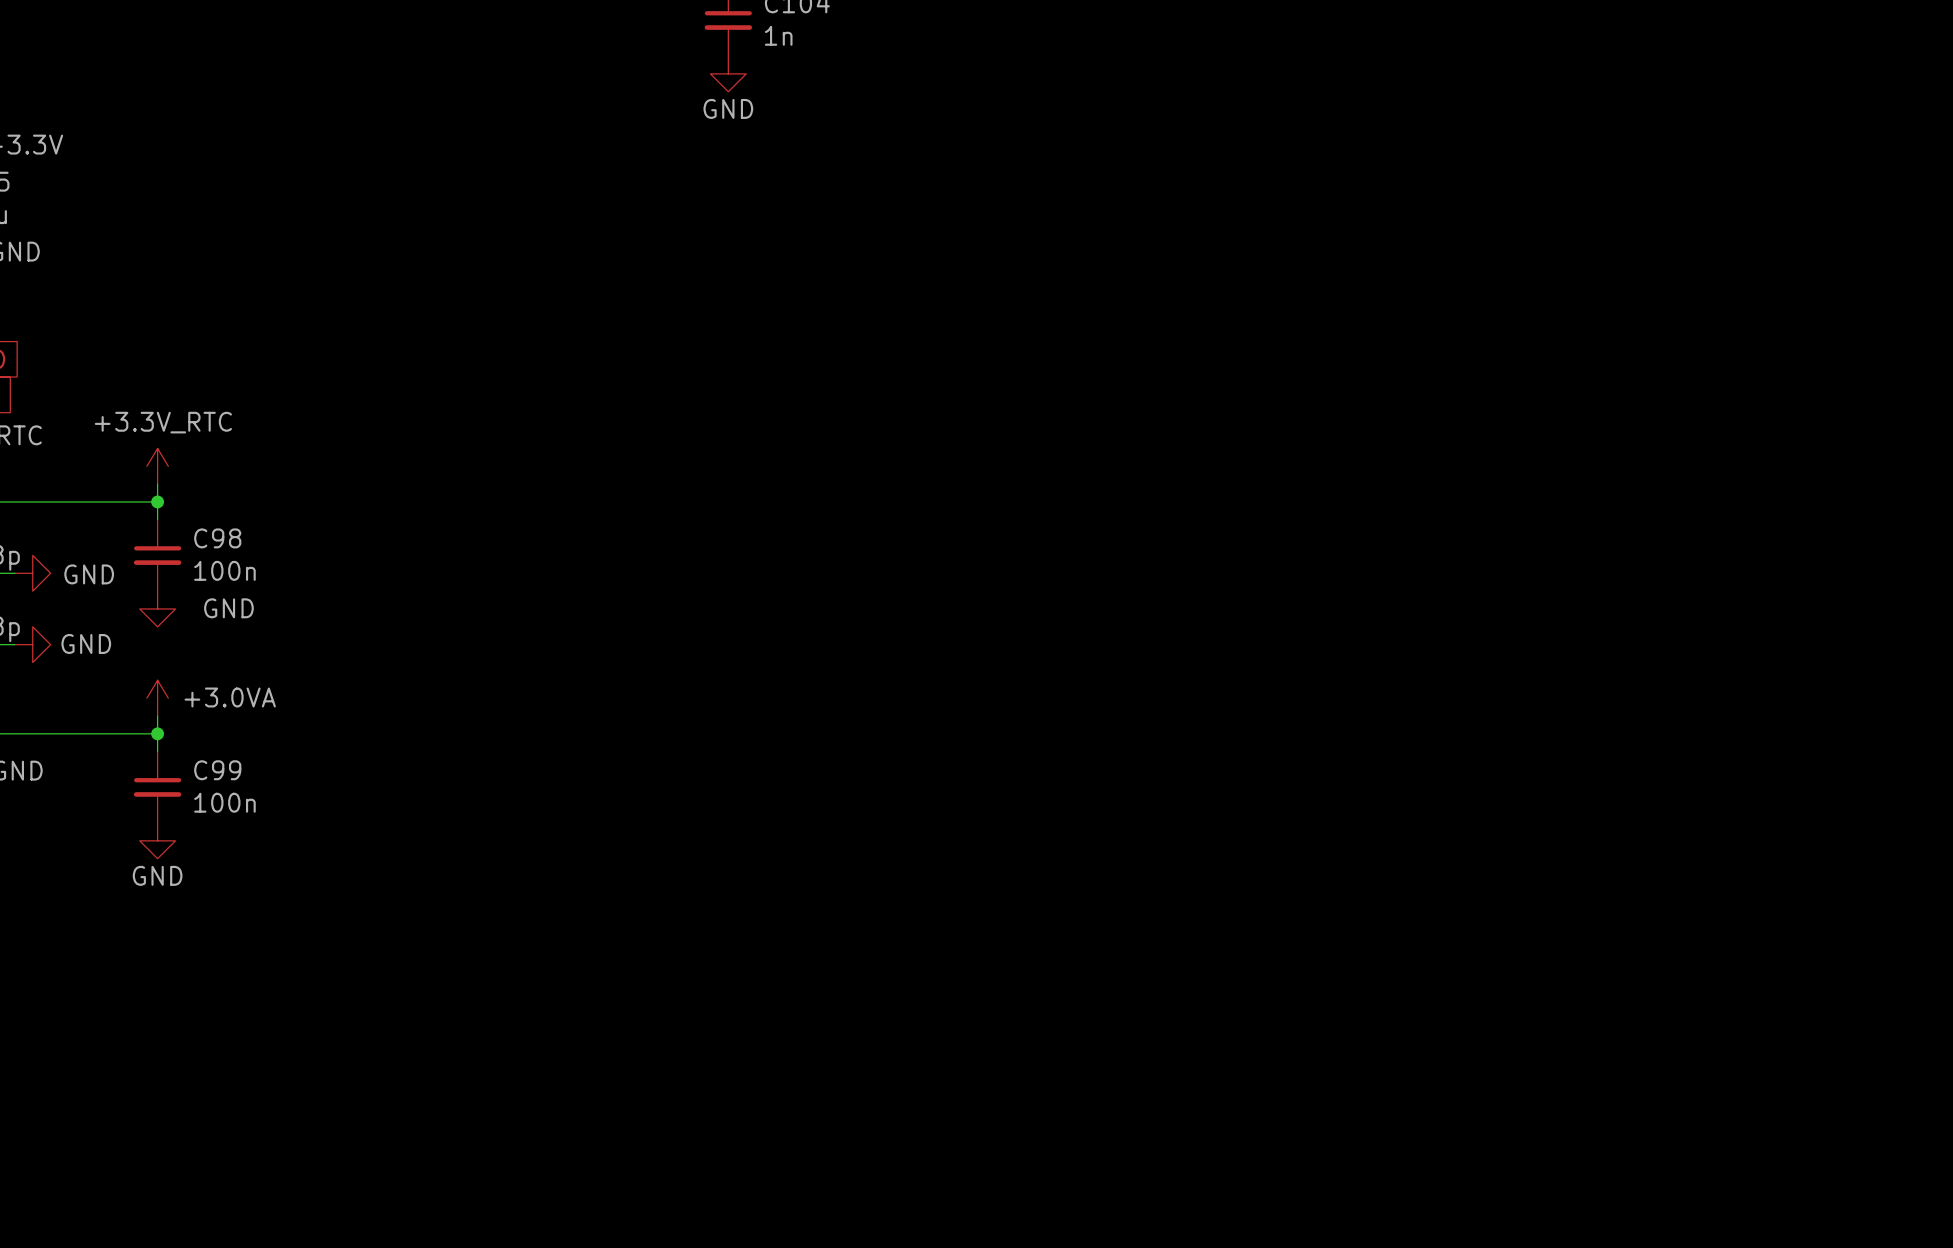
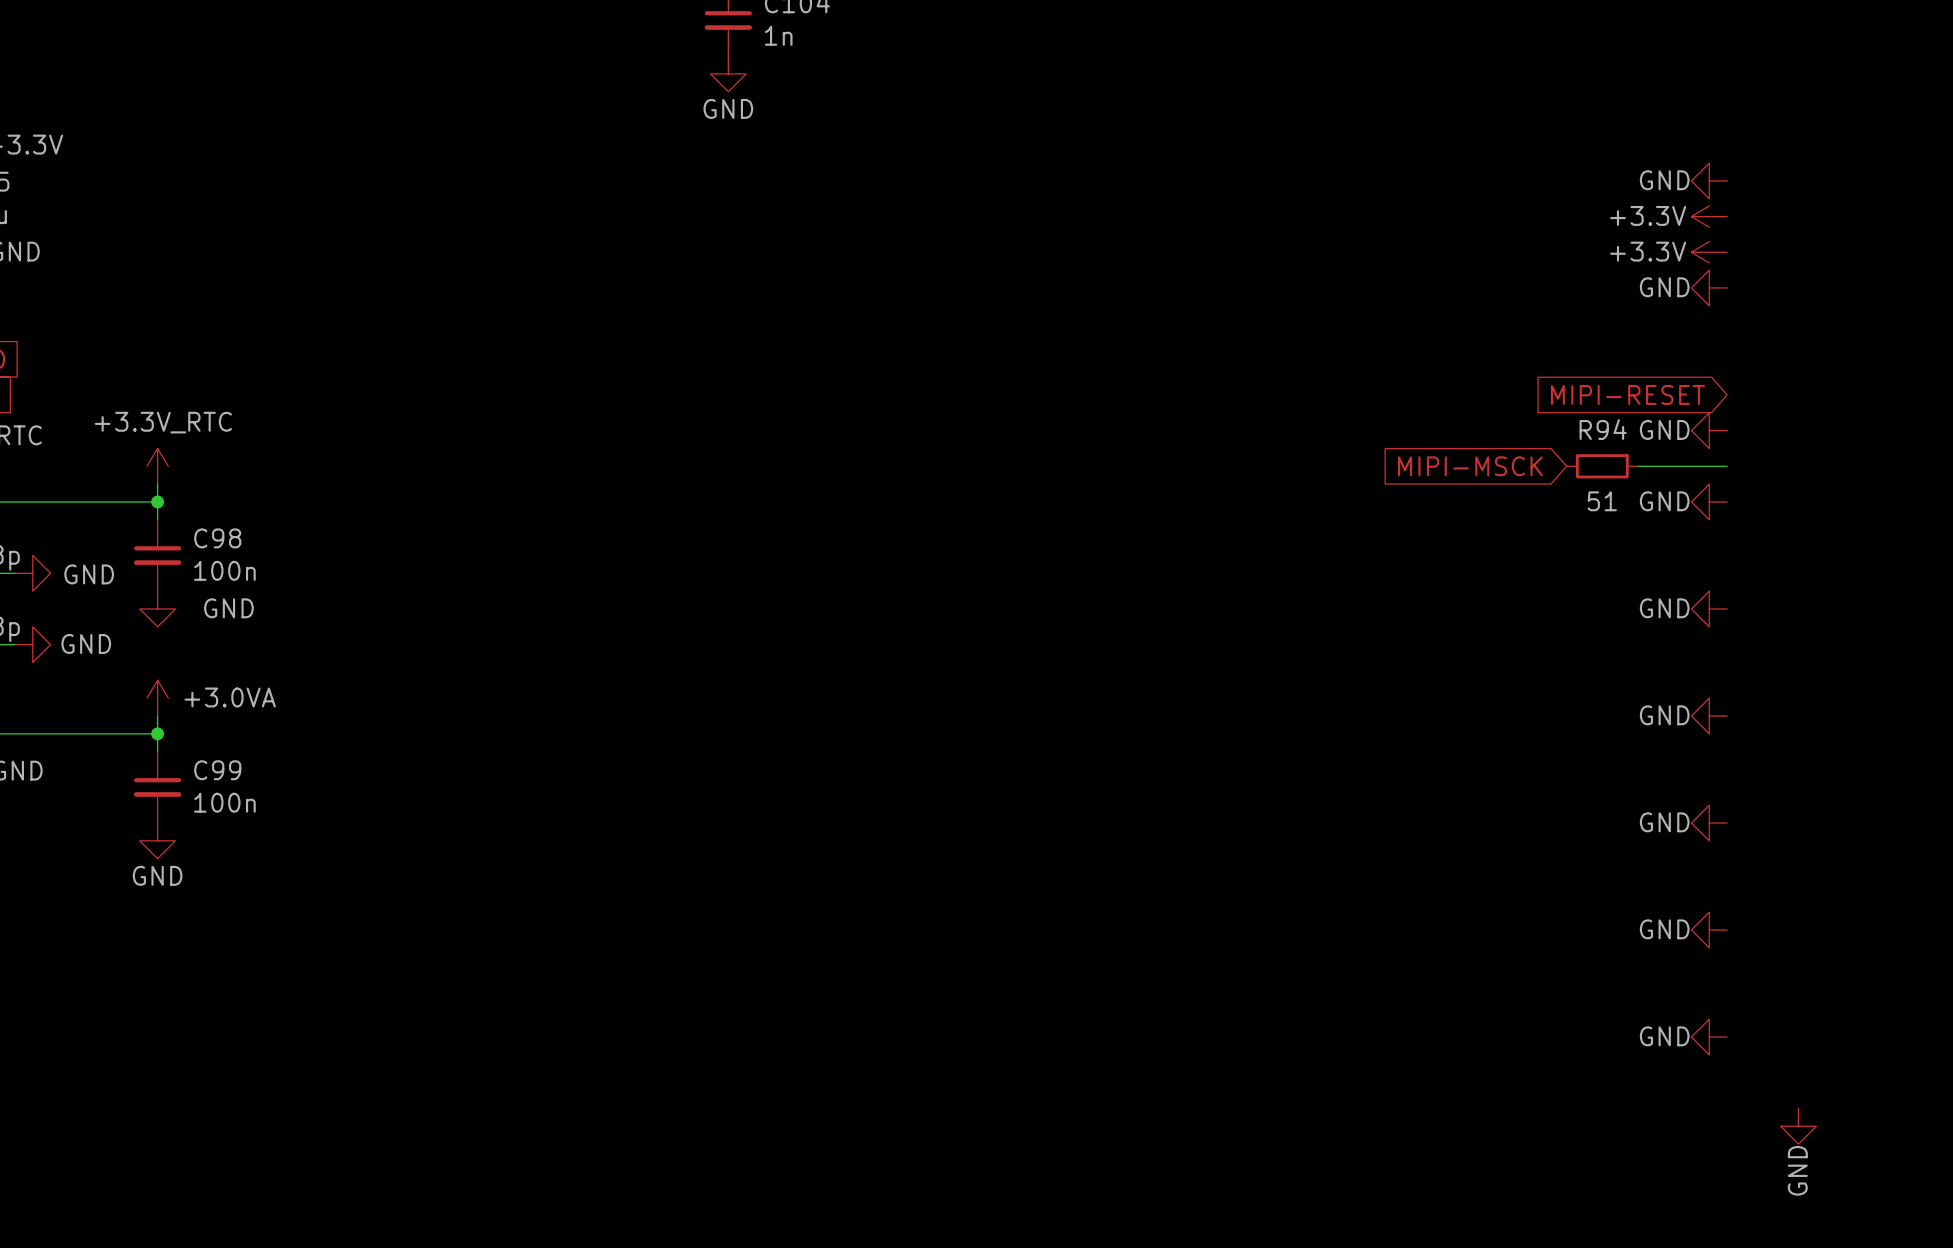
power symbol: none -> GND (1709, 180)
power symbol: none -> +3.3V (1709, 216)
power symbol: none -> +3.3V (1709, 252)
power symbol: none -> GND (1709, 287)
global label: none -> MIPI-RESET (1627, 394)
power symbol: none -> GND (1709, 430)
global label: none -> MIPI-MSCK (1470, 466)
R94: none -> 51 (1602, 466)
wire: none -> (1637, 466) (1727, 466)
power symbol: none -> GND (1709, 501)
power symbol: none -> GND (1709, 608)
power symbol: none -> GND (1709, 716)
power symbol: none -> GND (1709, 823)
power symbol: none -> GND (1709, 930)
power symbol: none -> GND (1709, 1037)
power symbol: none -> GND (1798, 1126)

